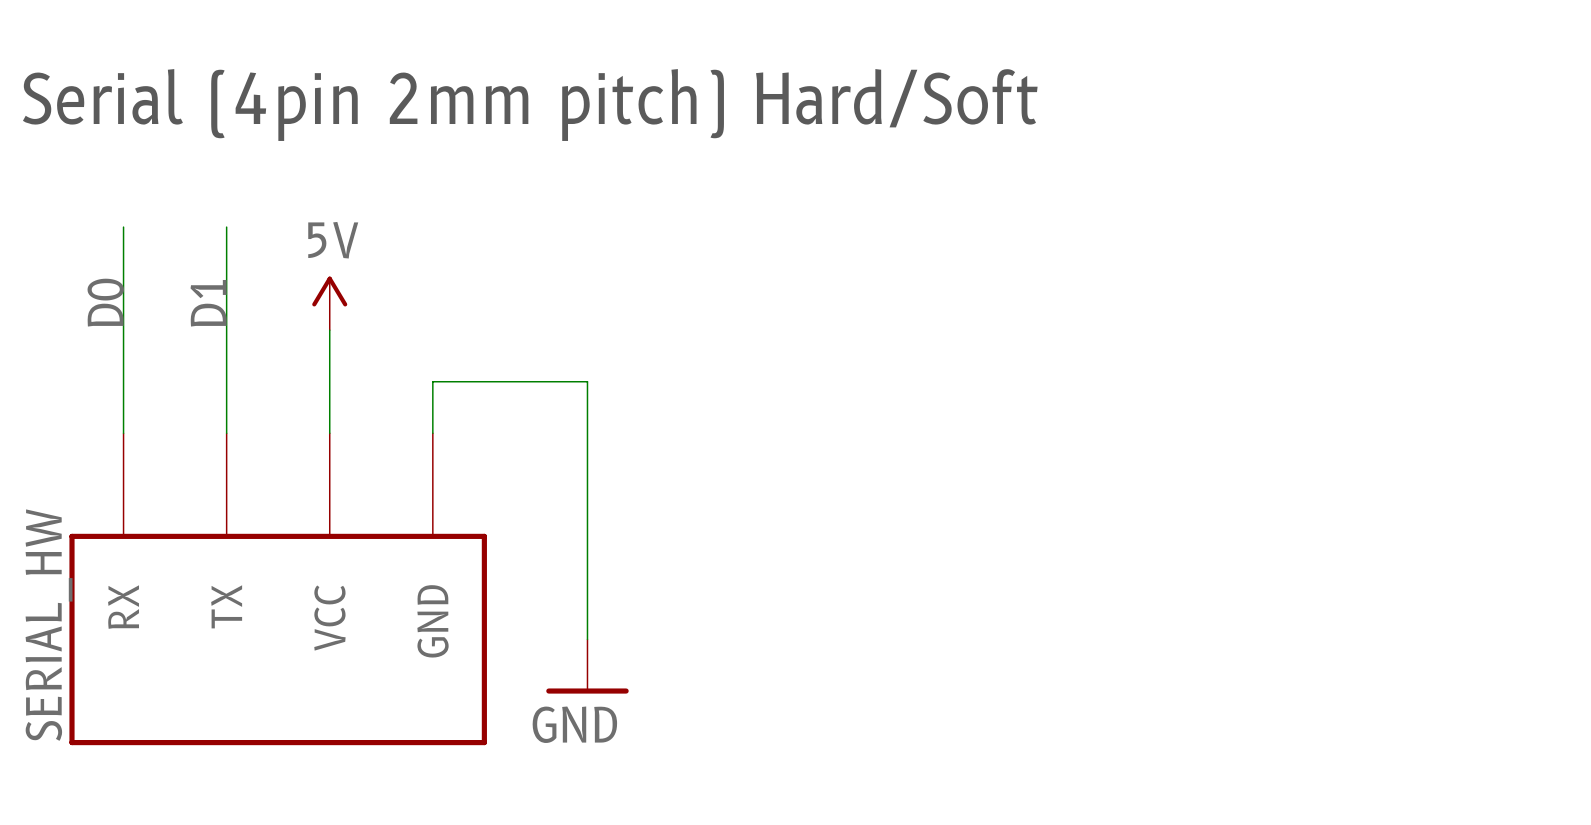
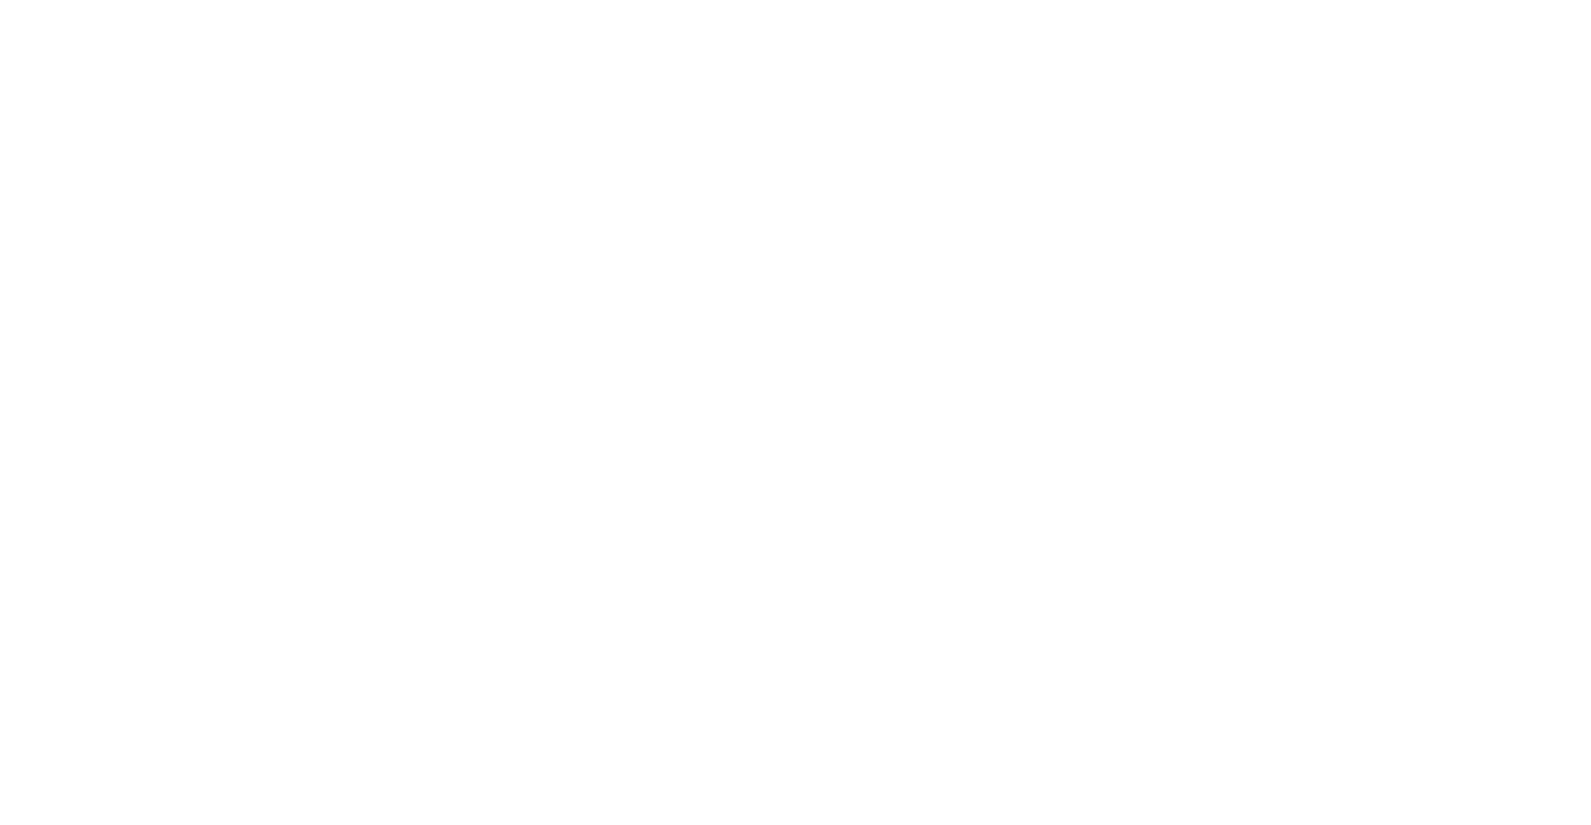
text: Serial (4pin 2mm pitch) Hard/Soft (530, 105) -> none
wire: (123, 227) (123, 433) -> none
wire: (226, 227) (226, 433) -> none
label: D0 (105, 302) -> none
label: D1 (208, 303) -> none
power symbol: 5V (329, 303) -> none
wire: (329, 330) (329, 433) -> none
wire: (432, 433) (432, 381) (587, 381) (587, 639) -> none
SERIAL_HW: (278, 589) -> none
power symbol: GND (587, 666) -> none

